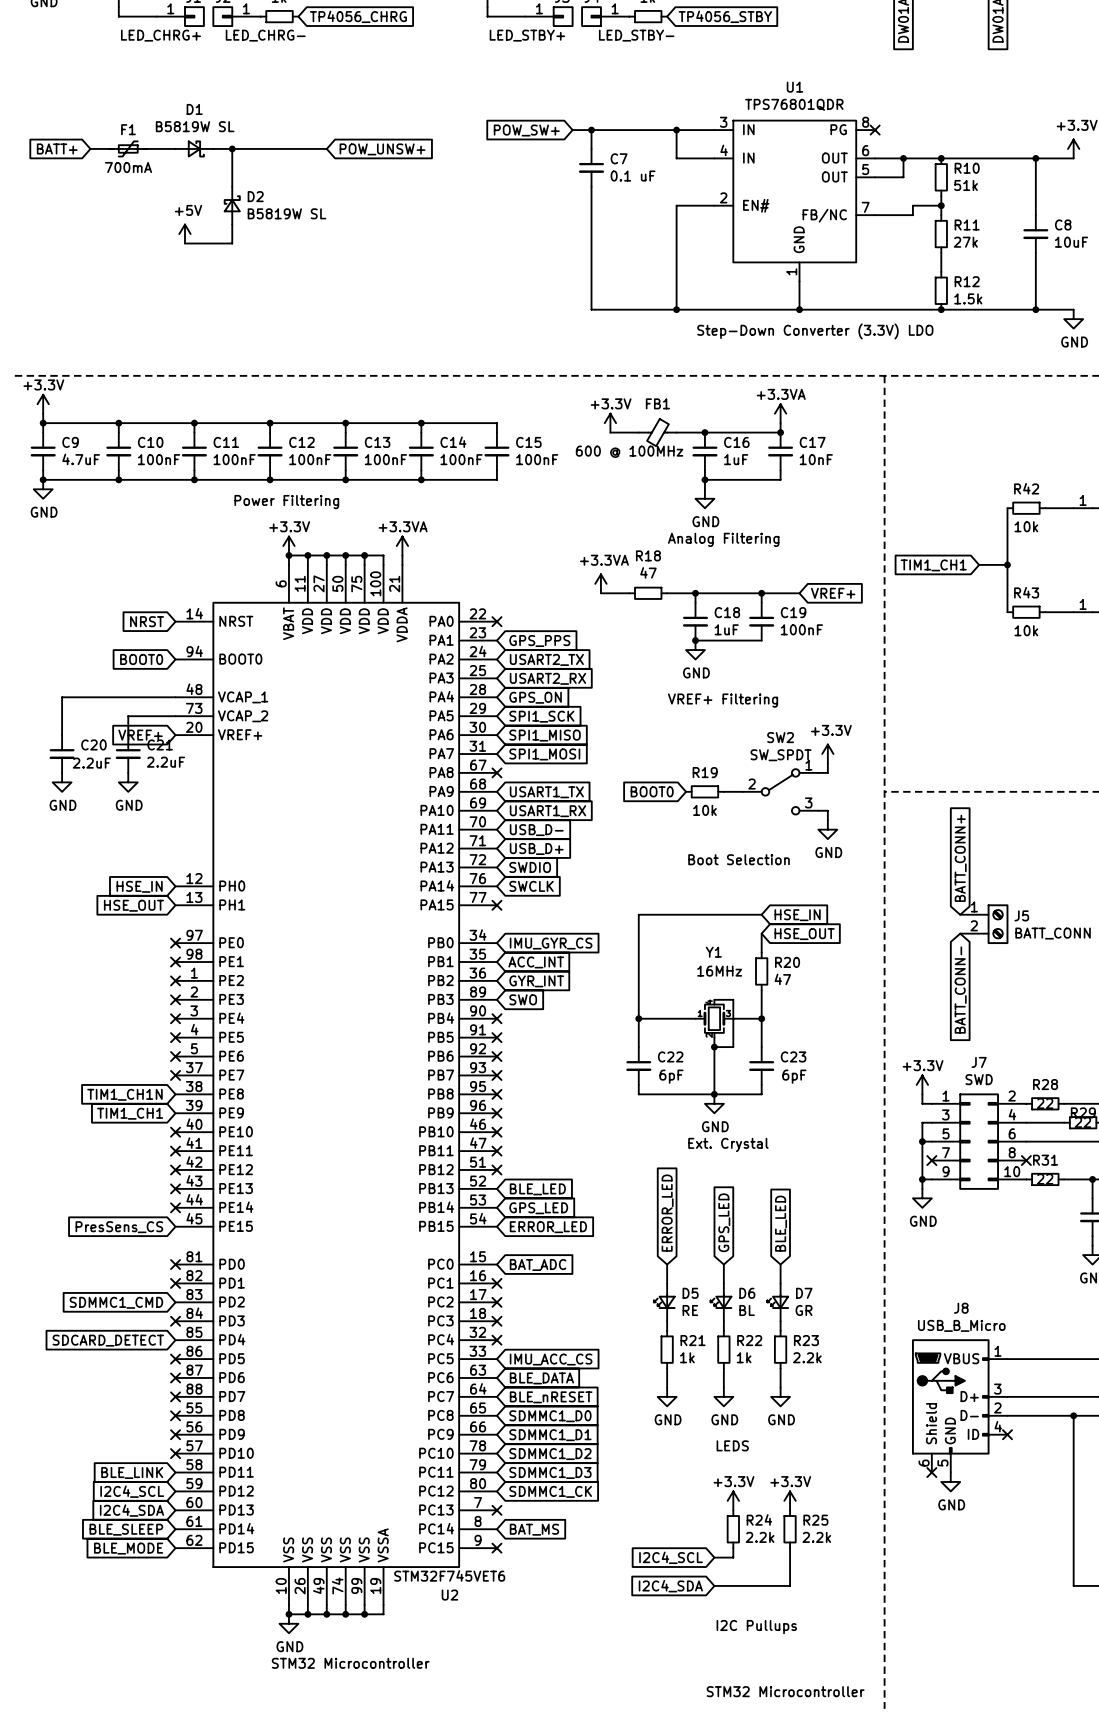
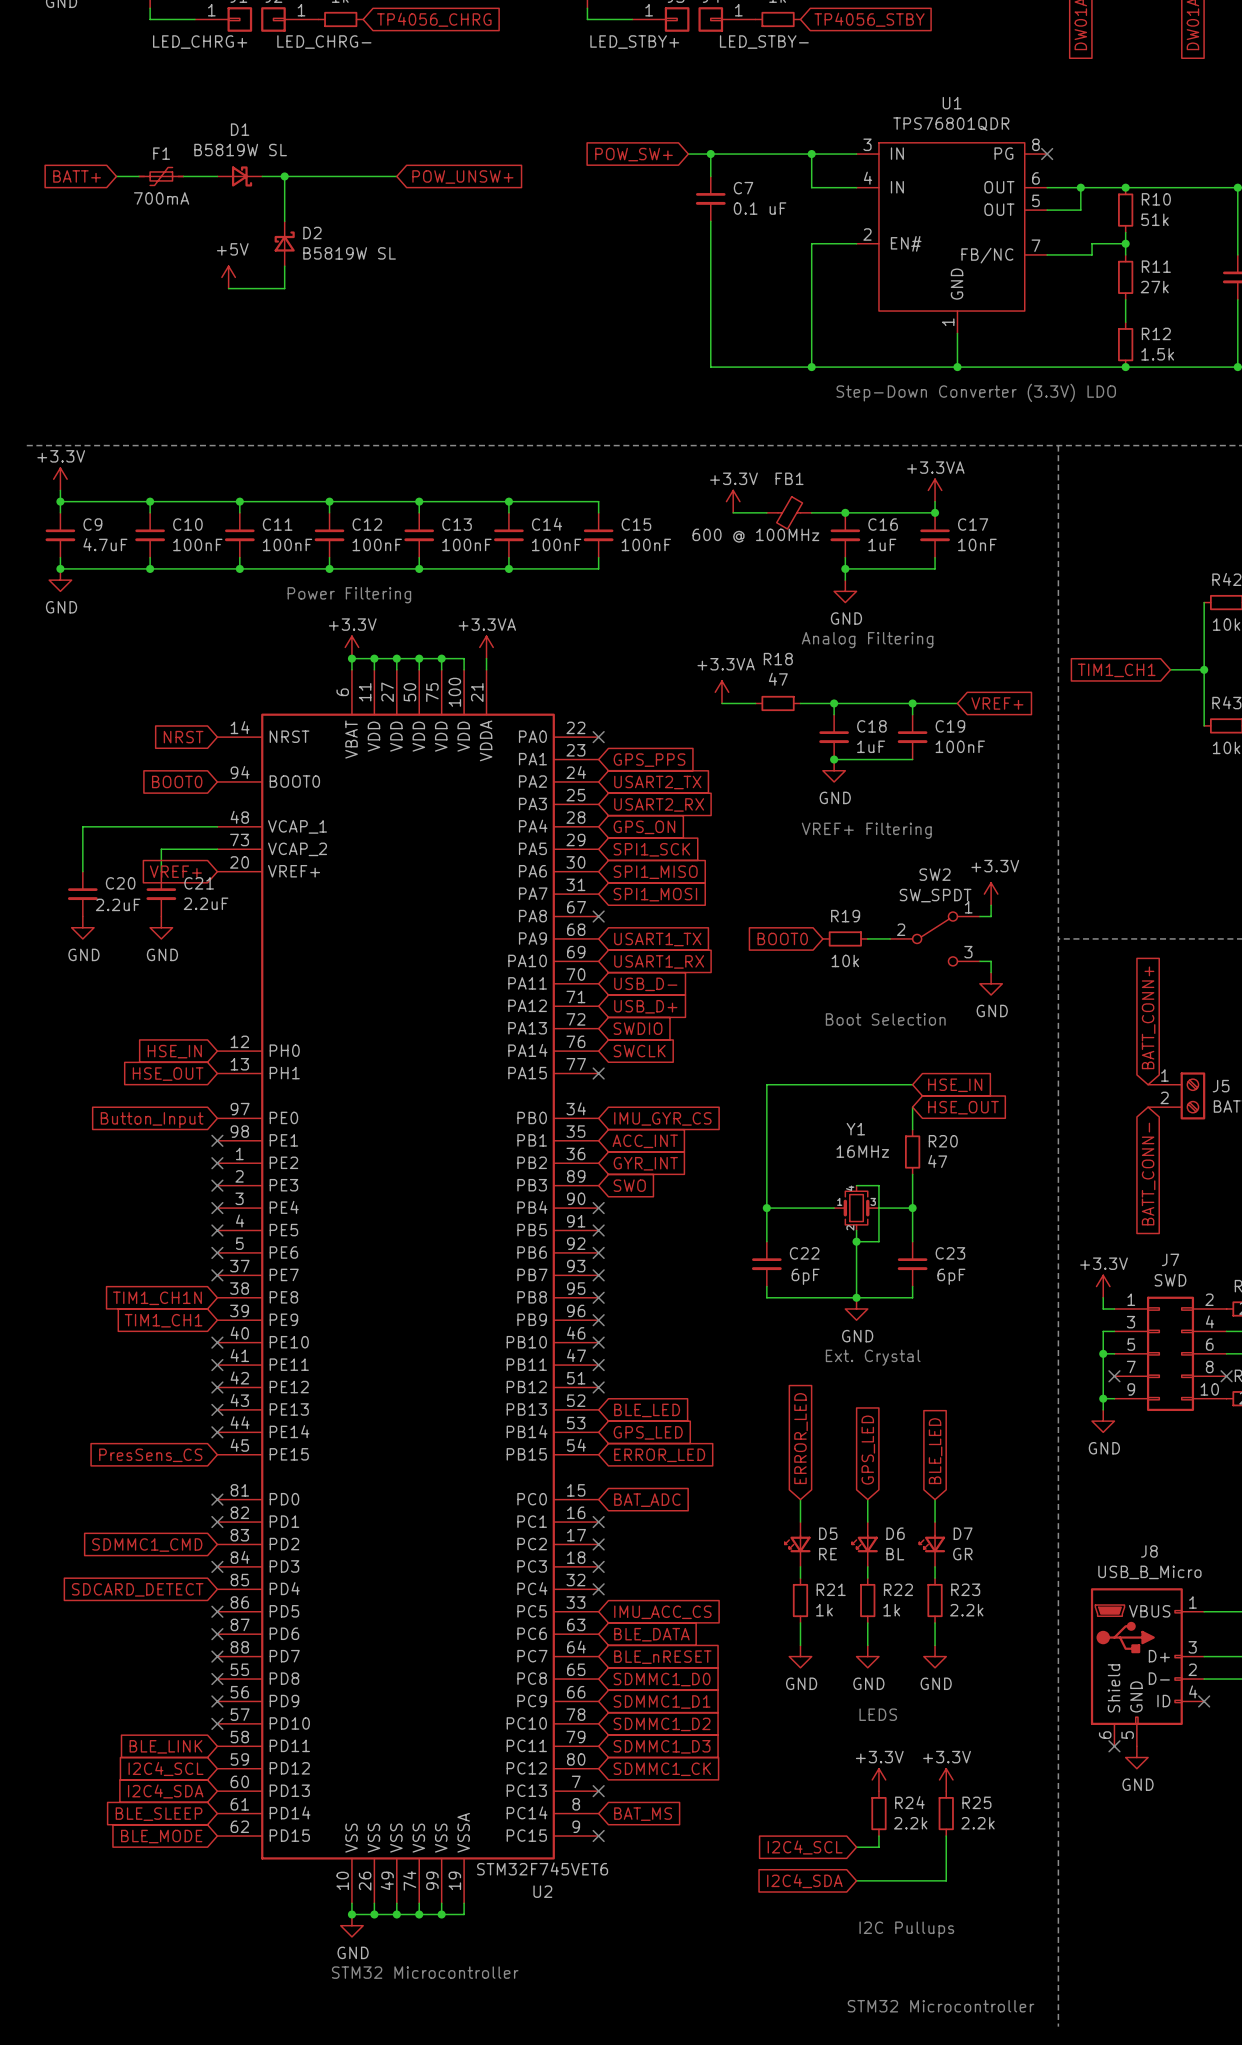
no-connect mark: (175, 943) -> none
global label: none -> Button_Input (152, 1120)

